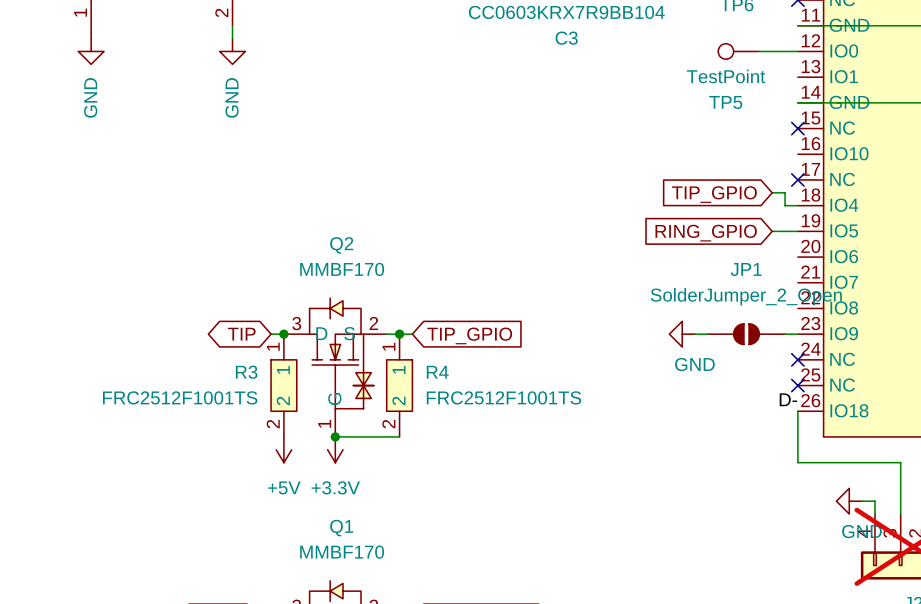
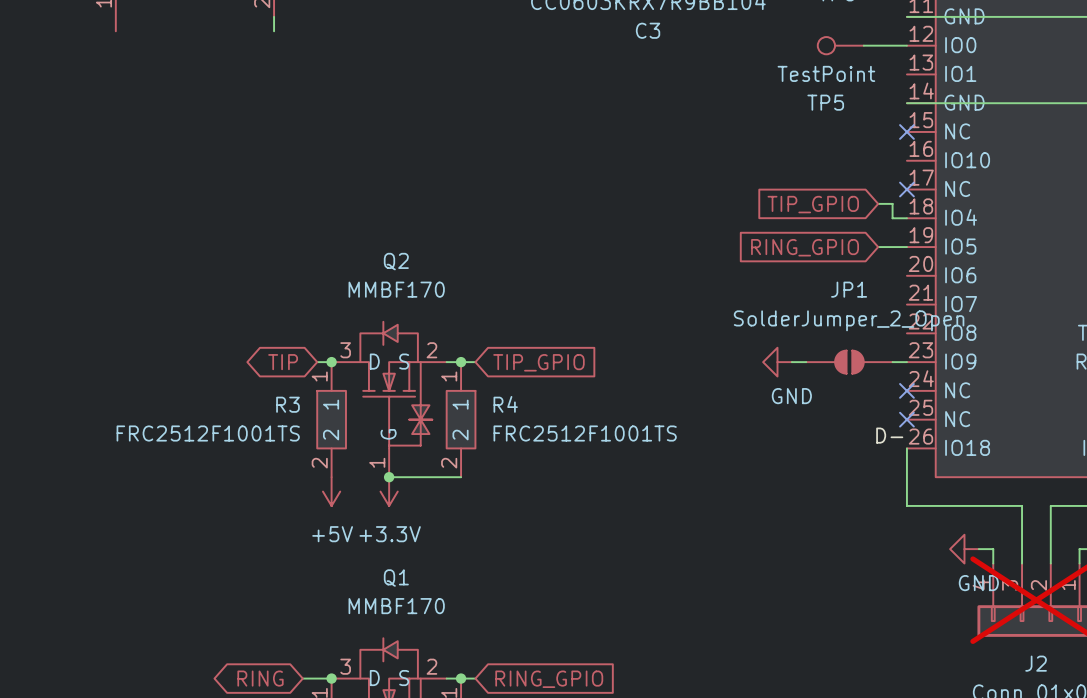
power symbol: GND (91, 51) -> none
power symbol: GND (232, 51) -> none

